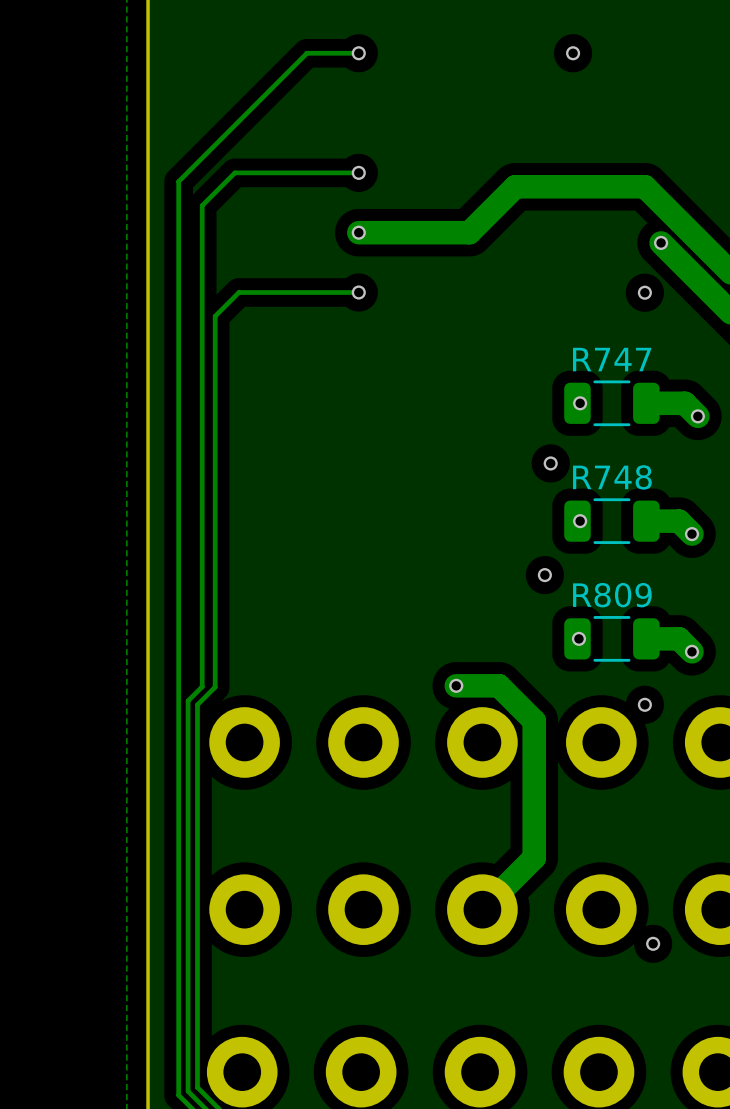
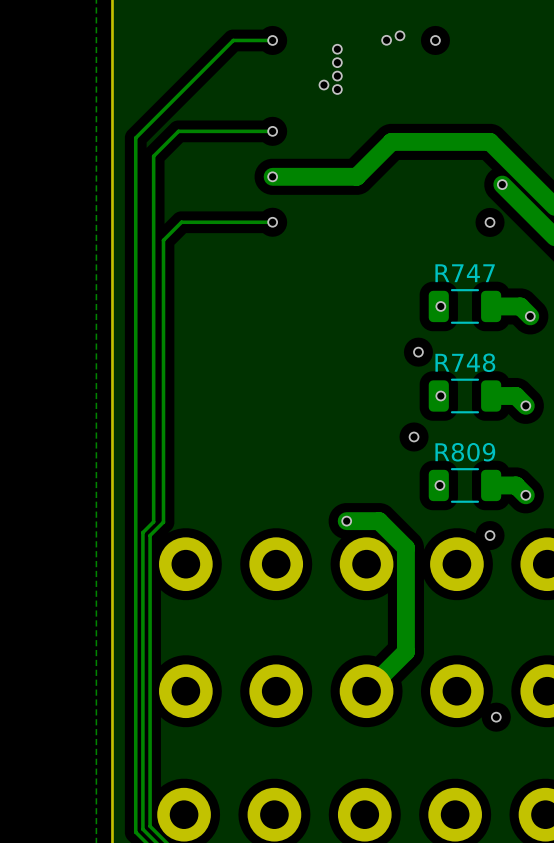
via: none -> (400, 35)
via: none -> (386, 40)
via: none -> (337, 49)
via: none -> (337, 62)
via: none -> (337, 76)
via: none -> (323, 85)
via: none -> (337, 89)

